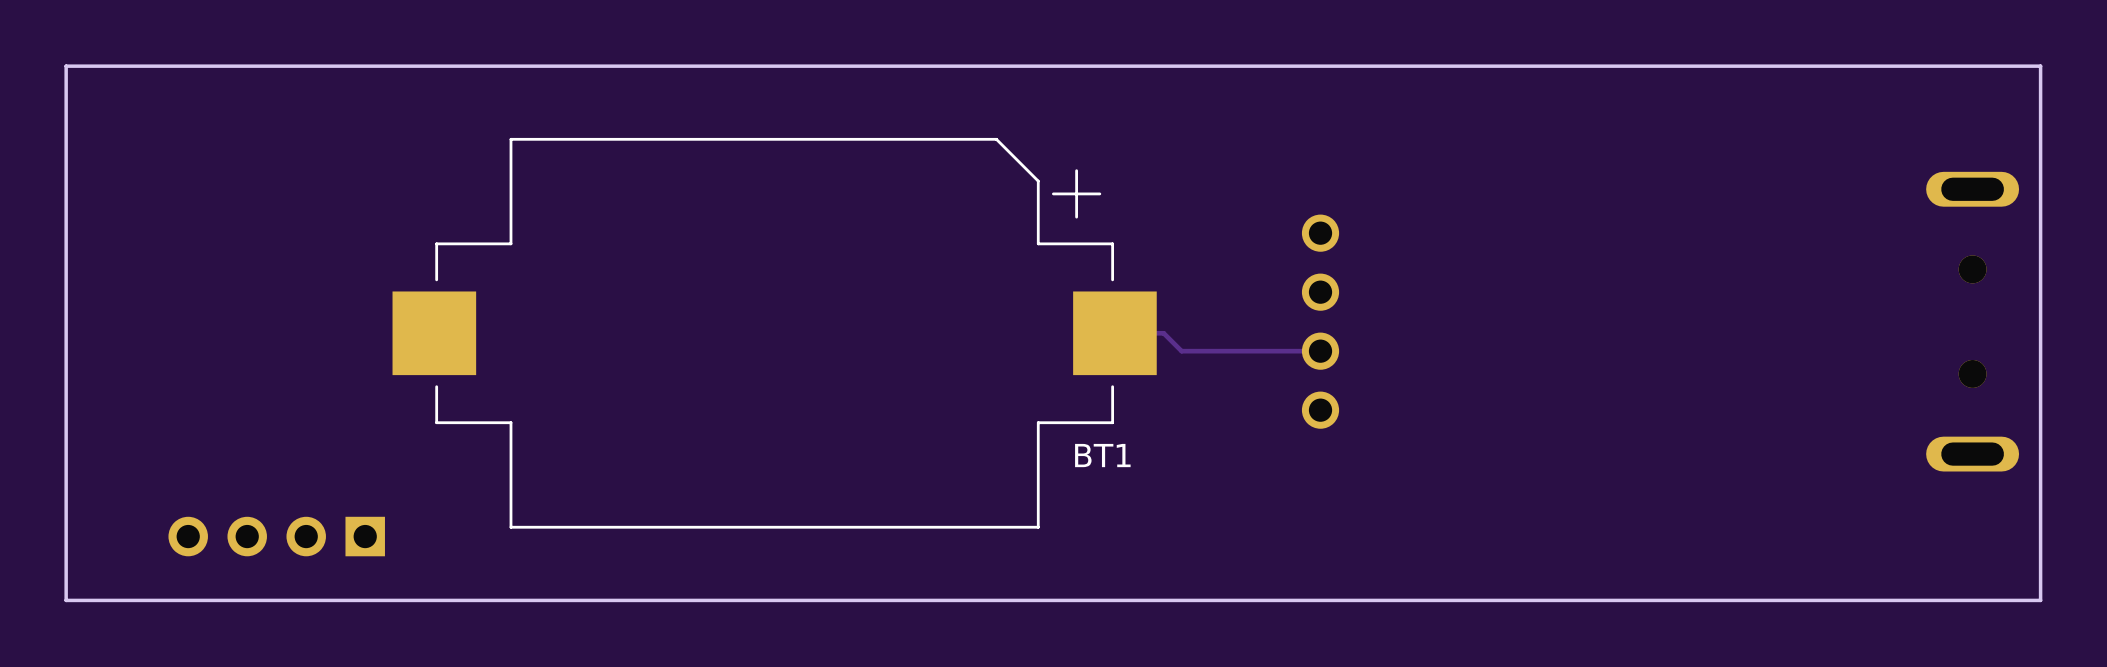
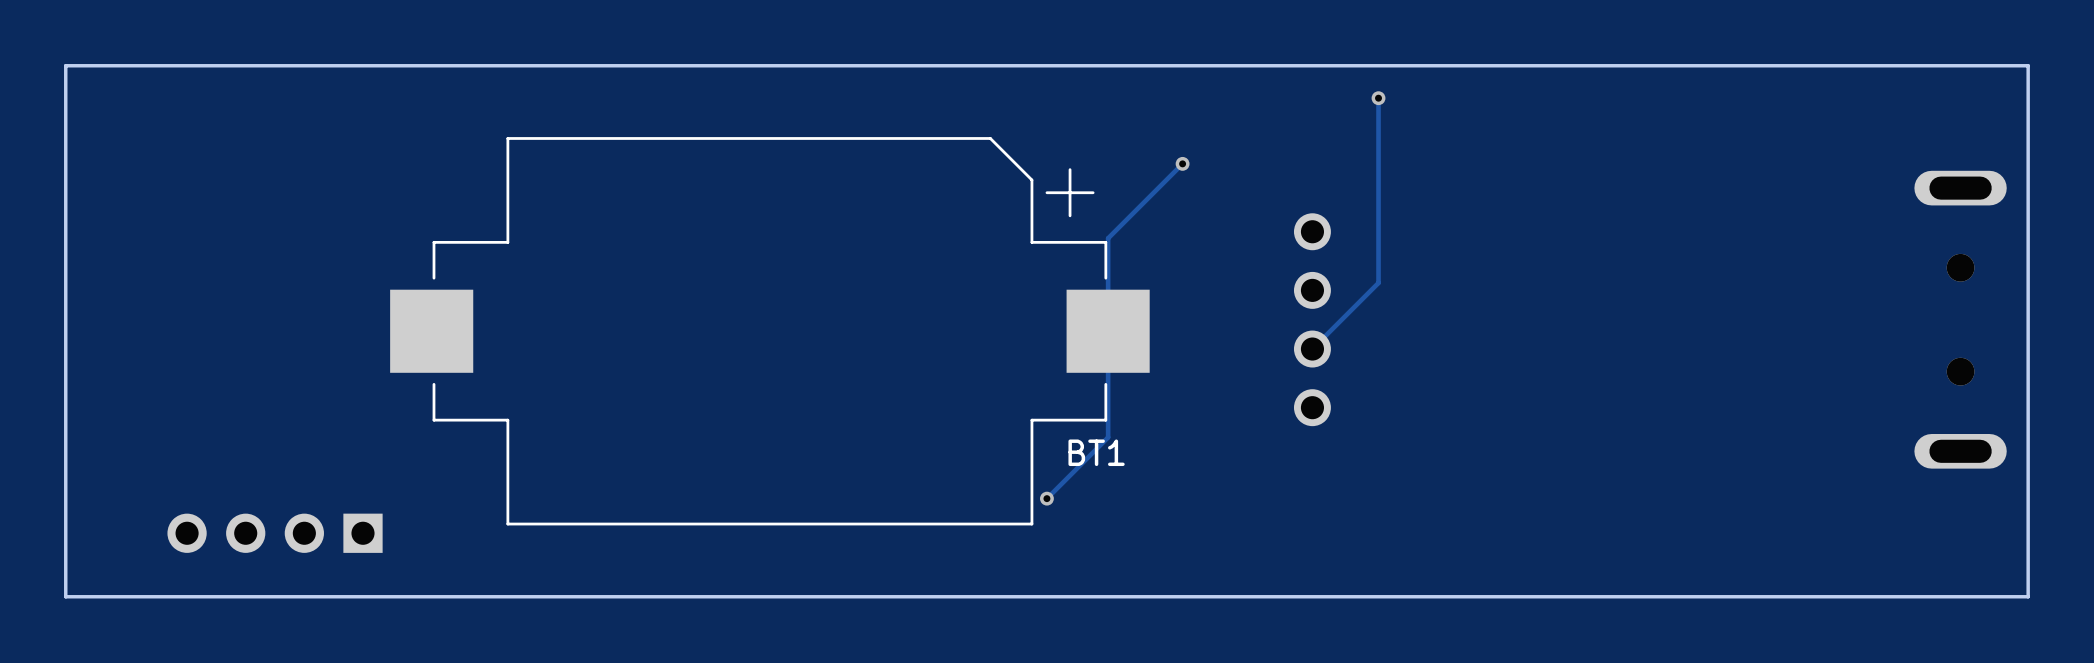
via: none -> (1378, 98)
track: none -> (1182, 163) (1108, 238) (1108, 437) (1046, 498)
via: none -> (1182, 163)
track: (1114, 333) (1163, 333) (1181, 351) (1320, 351) -> (1378, 98) (1378, 282) (1312, 349)
via: none -> (1046, 498)

